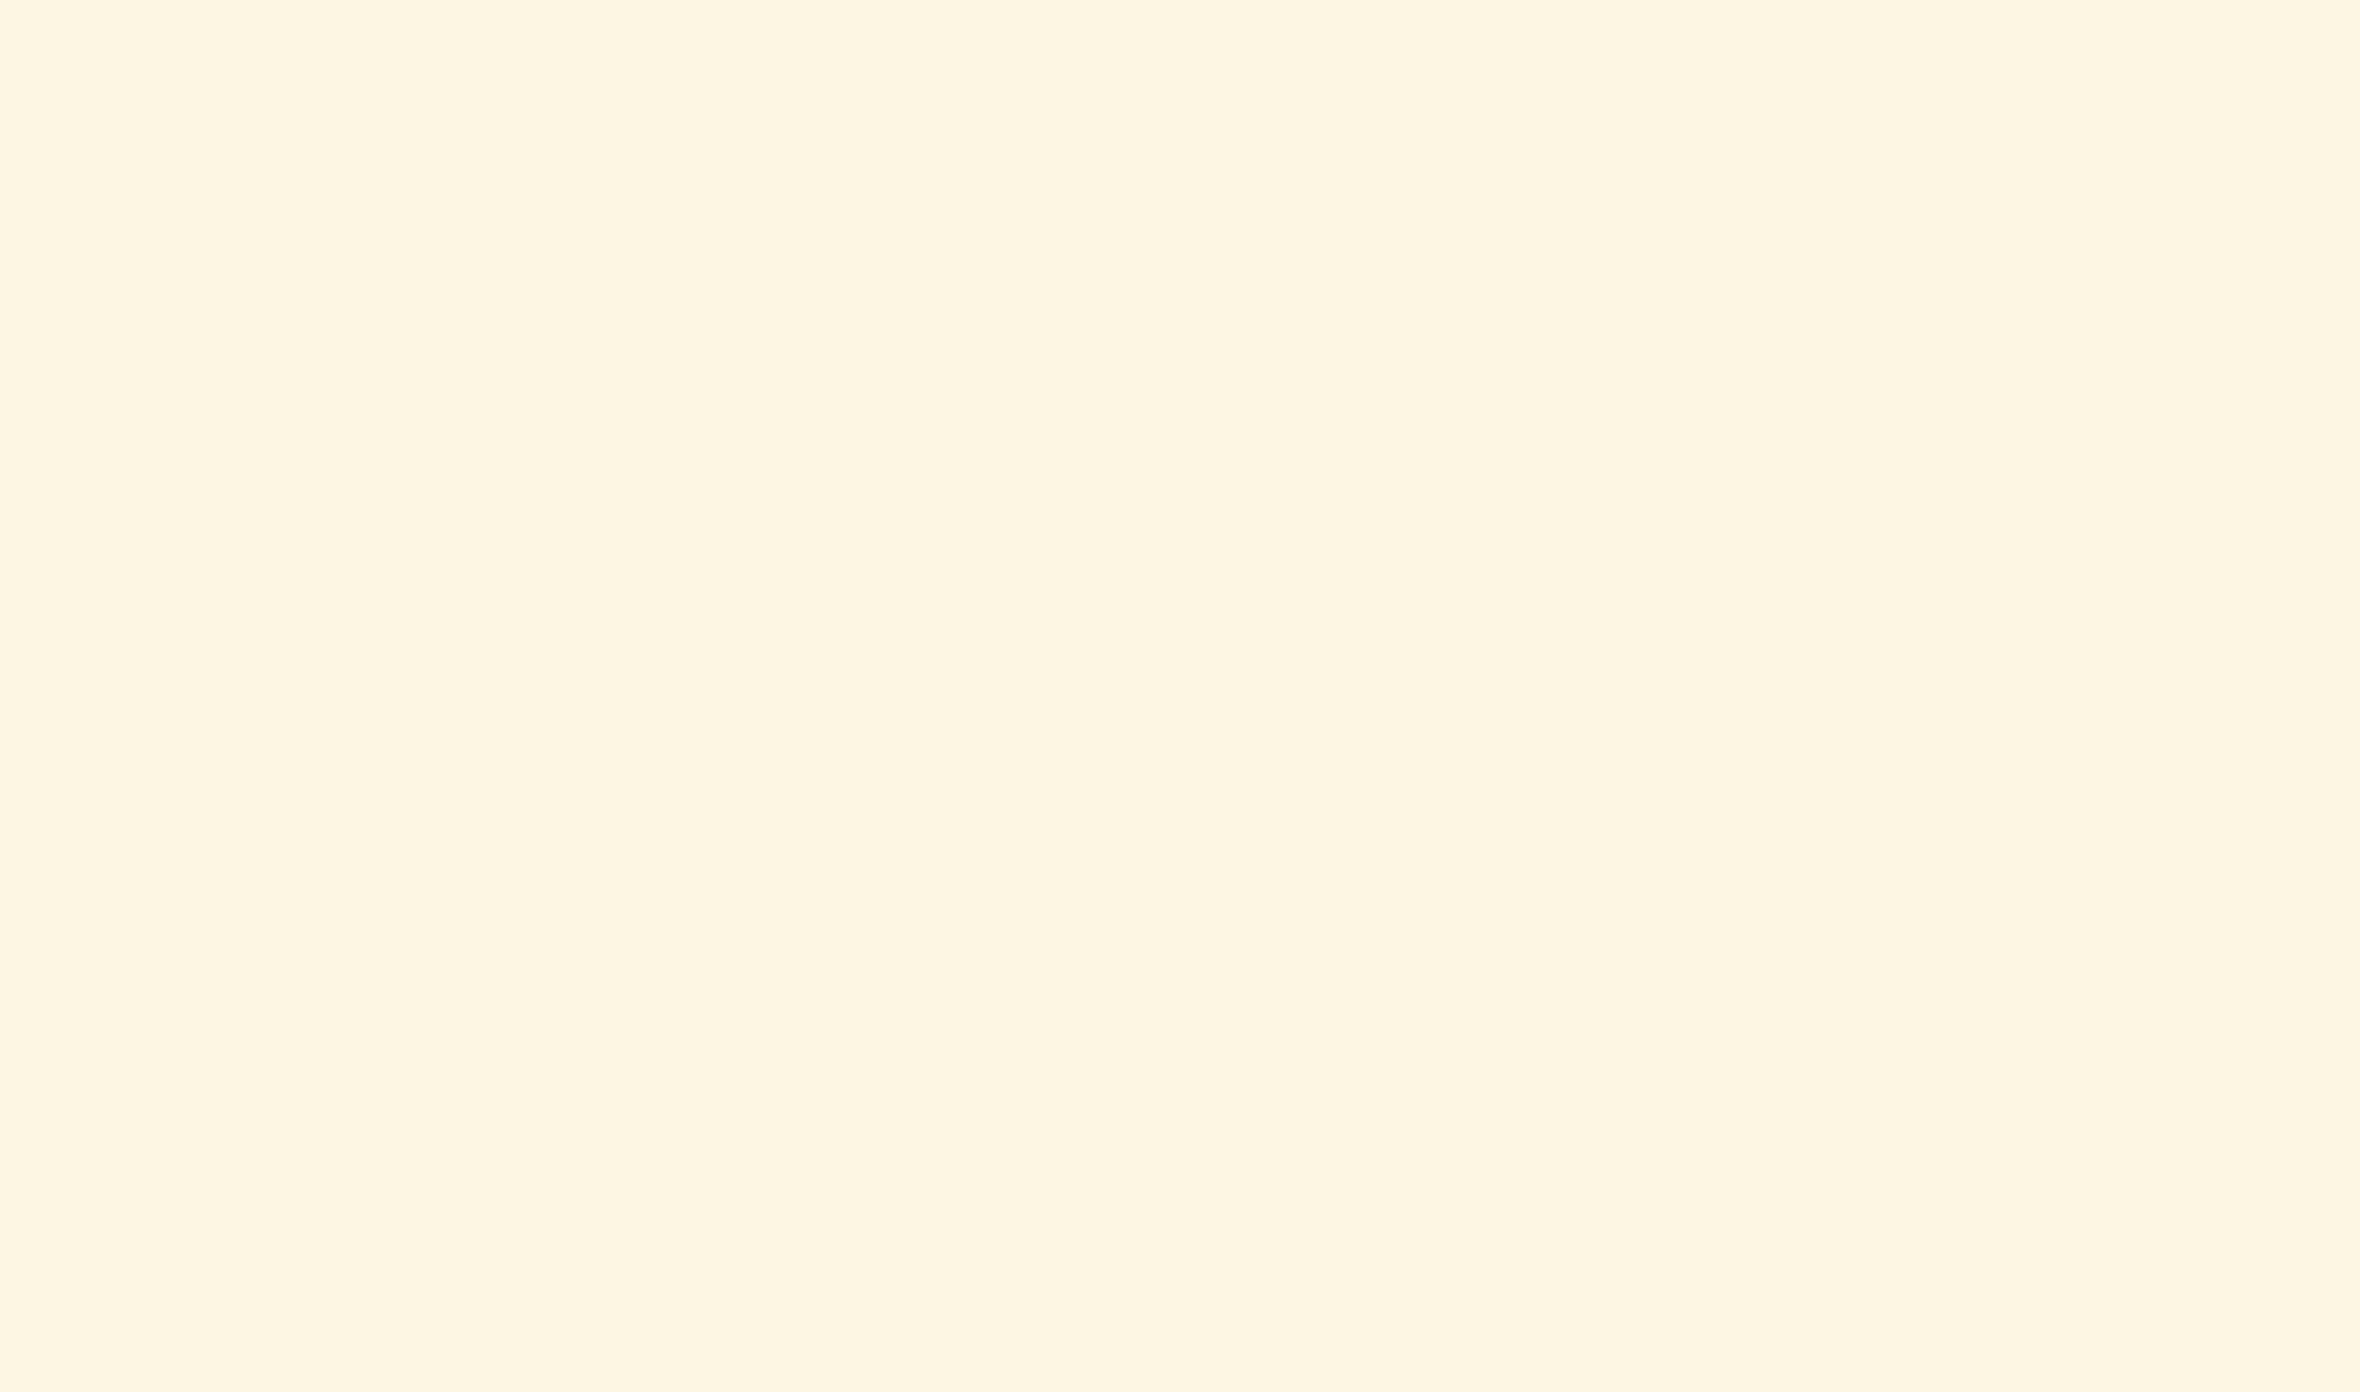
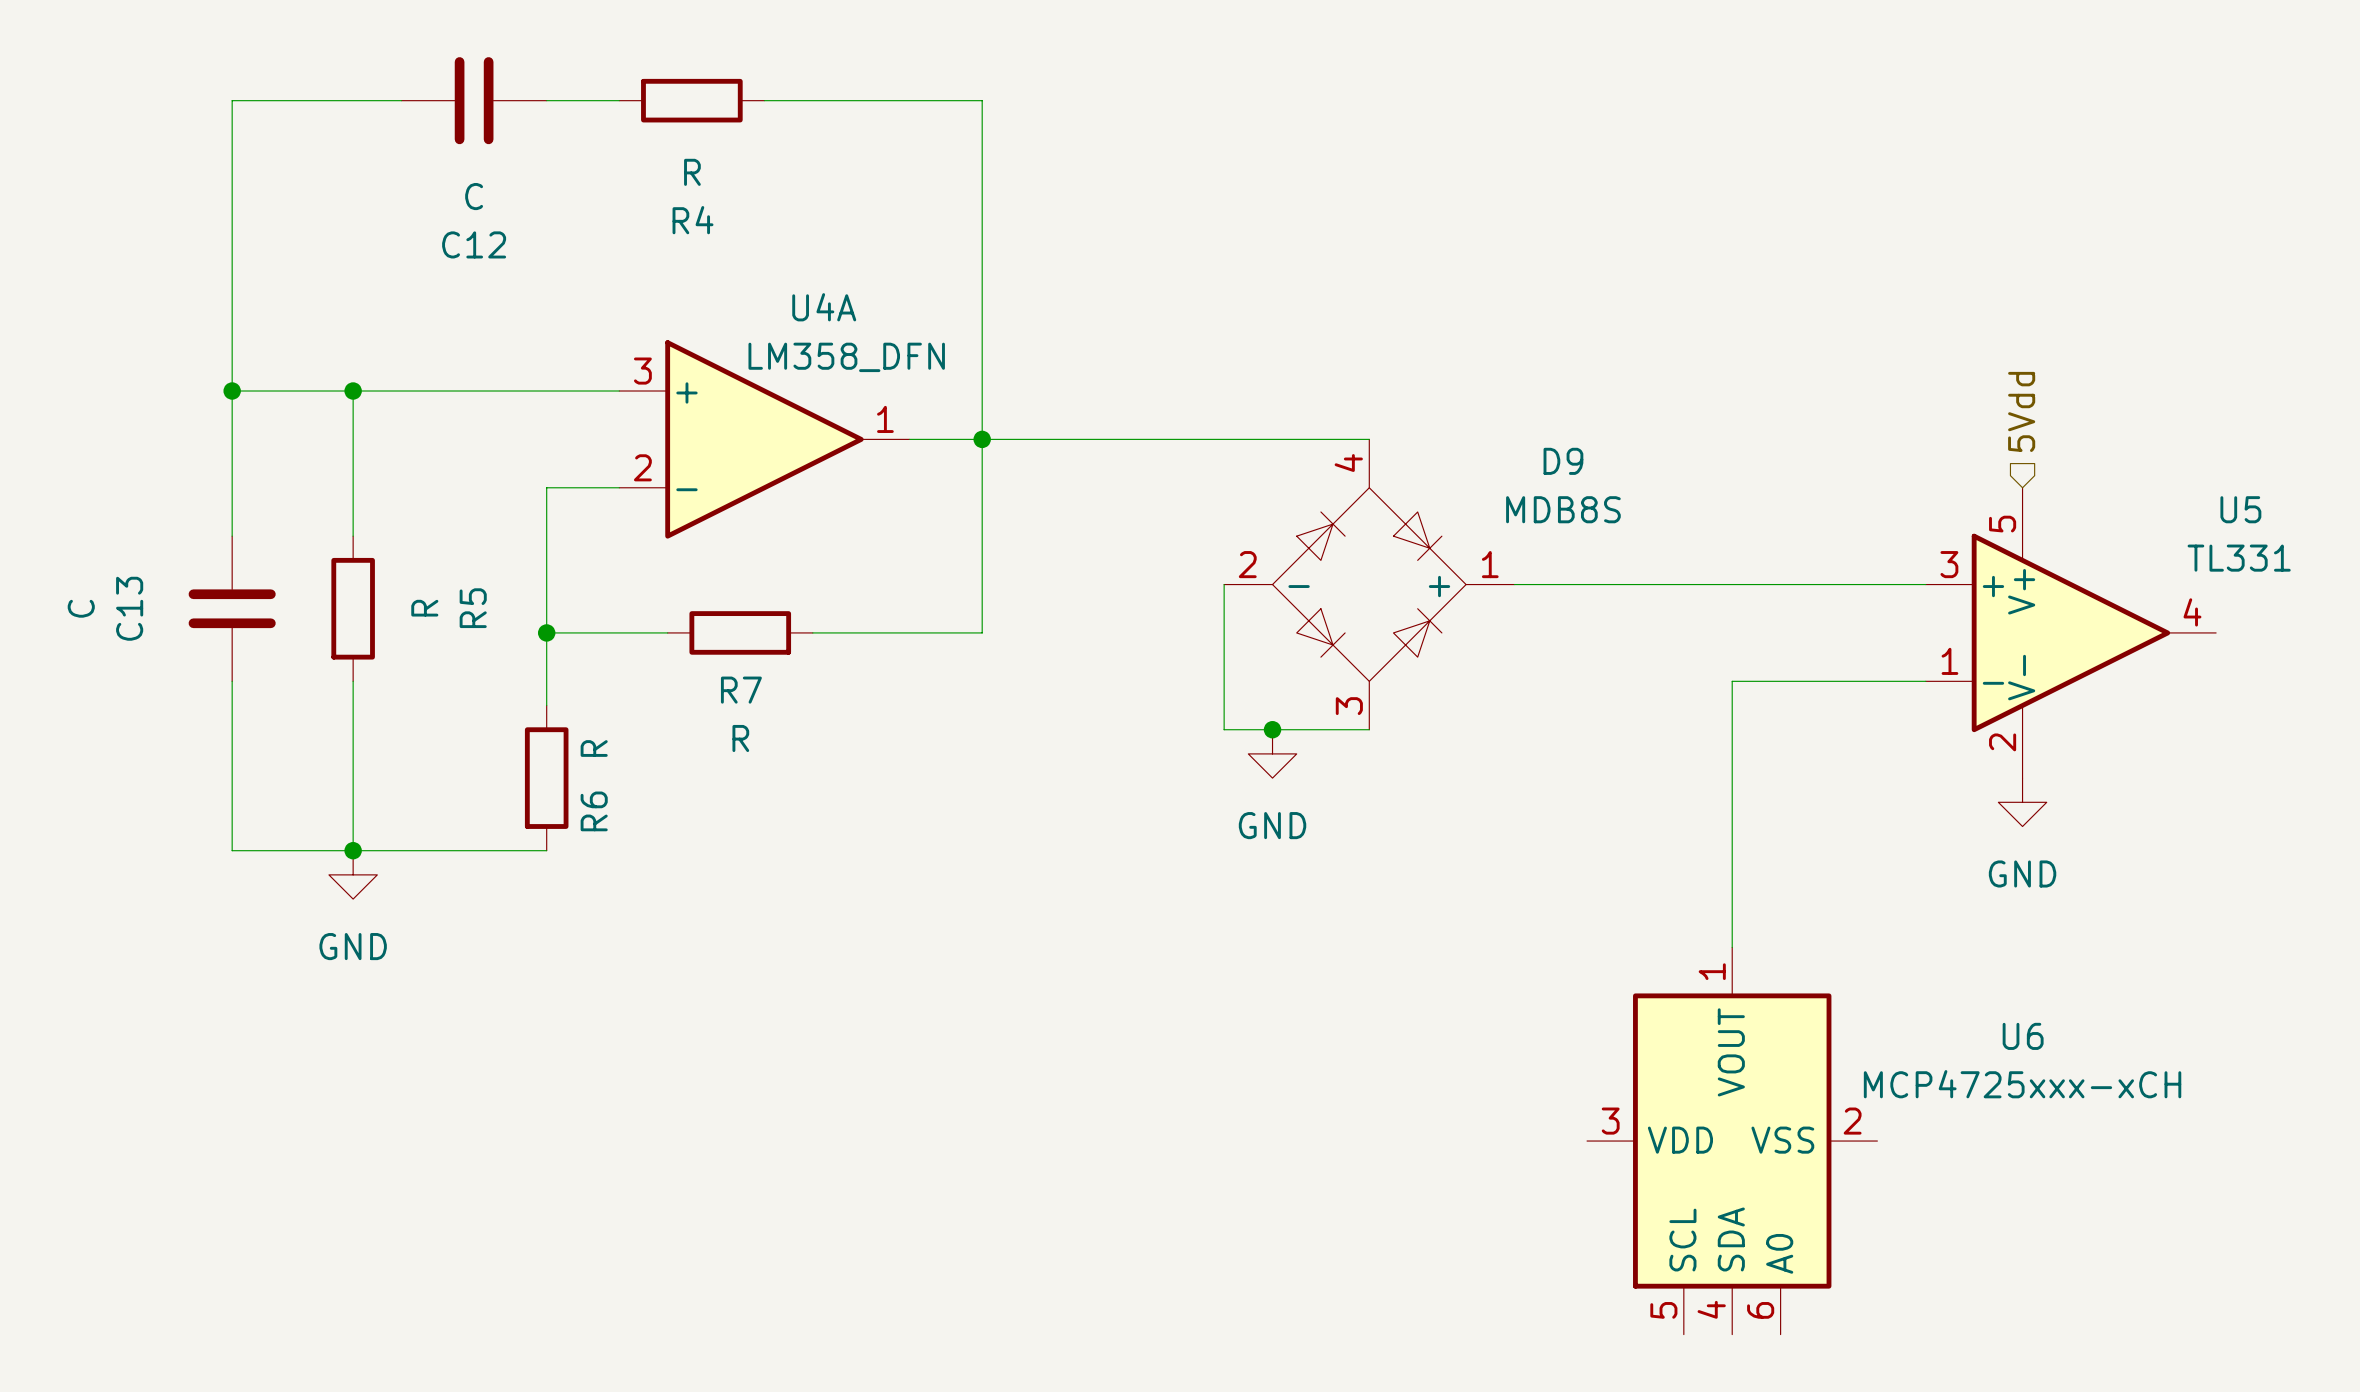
wire: none -> (401, 100) (232, 100) (232, 536)
C12: none -> C (474, 100)
wire: none -> (546, 100) (619, 100)
R4: none -> R (691, 100)
wire: none -> (764, 100) (982, 100) (982, 632) (812, 632)
wire: none -> (232, 391) (619, 391)
junction: none -> (232, 391)
wire: none -> (353, 391) (353, 536)
junction: none -> (353, 391)
hierarchical label: none -> 5Vdd (2021, 411)
U4A: none -> LM358_DFN (764, 439)
wire: none -> (909, 439) (1369, 439)
junction: none -> (982, 439)
wire: none -> (619, 487) (546, 487) (546, 705)
wire: none -> (1224, 584) (1224, 729) (1369, 729)
D9: none -> MDB8S (1369, 584)
wire: none -> (1514, 584) (1925, 584)
C13: none -> C (232, 608)
R5: none -> R (353, 608)
wire: none -> (546, 632) (667, 632)
junction: none -> (546, 632)
R7: none -> R (740, 632)
U5: none -> TL331 (2070, 632)
wire: none -> (232, 681) (232, 850) (546, 850)
wire: none -> (353, 681) (353, 850)
wire: none -> (1925, 681) (1732, 681) (1732, 947)
junction: none -> (1272, 729)
power symbol: none -> GND (1272, 753)
R6: none -> R (546, 778)
power symbol: none -> GND (2022, 802)
junction: none -> (353, 850)
power symbol: none -> GND (353, 874)
U6: none -> MCP4725xxx-xCH (1732, 1141)

